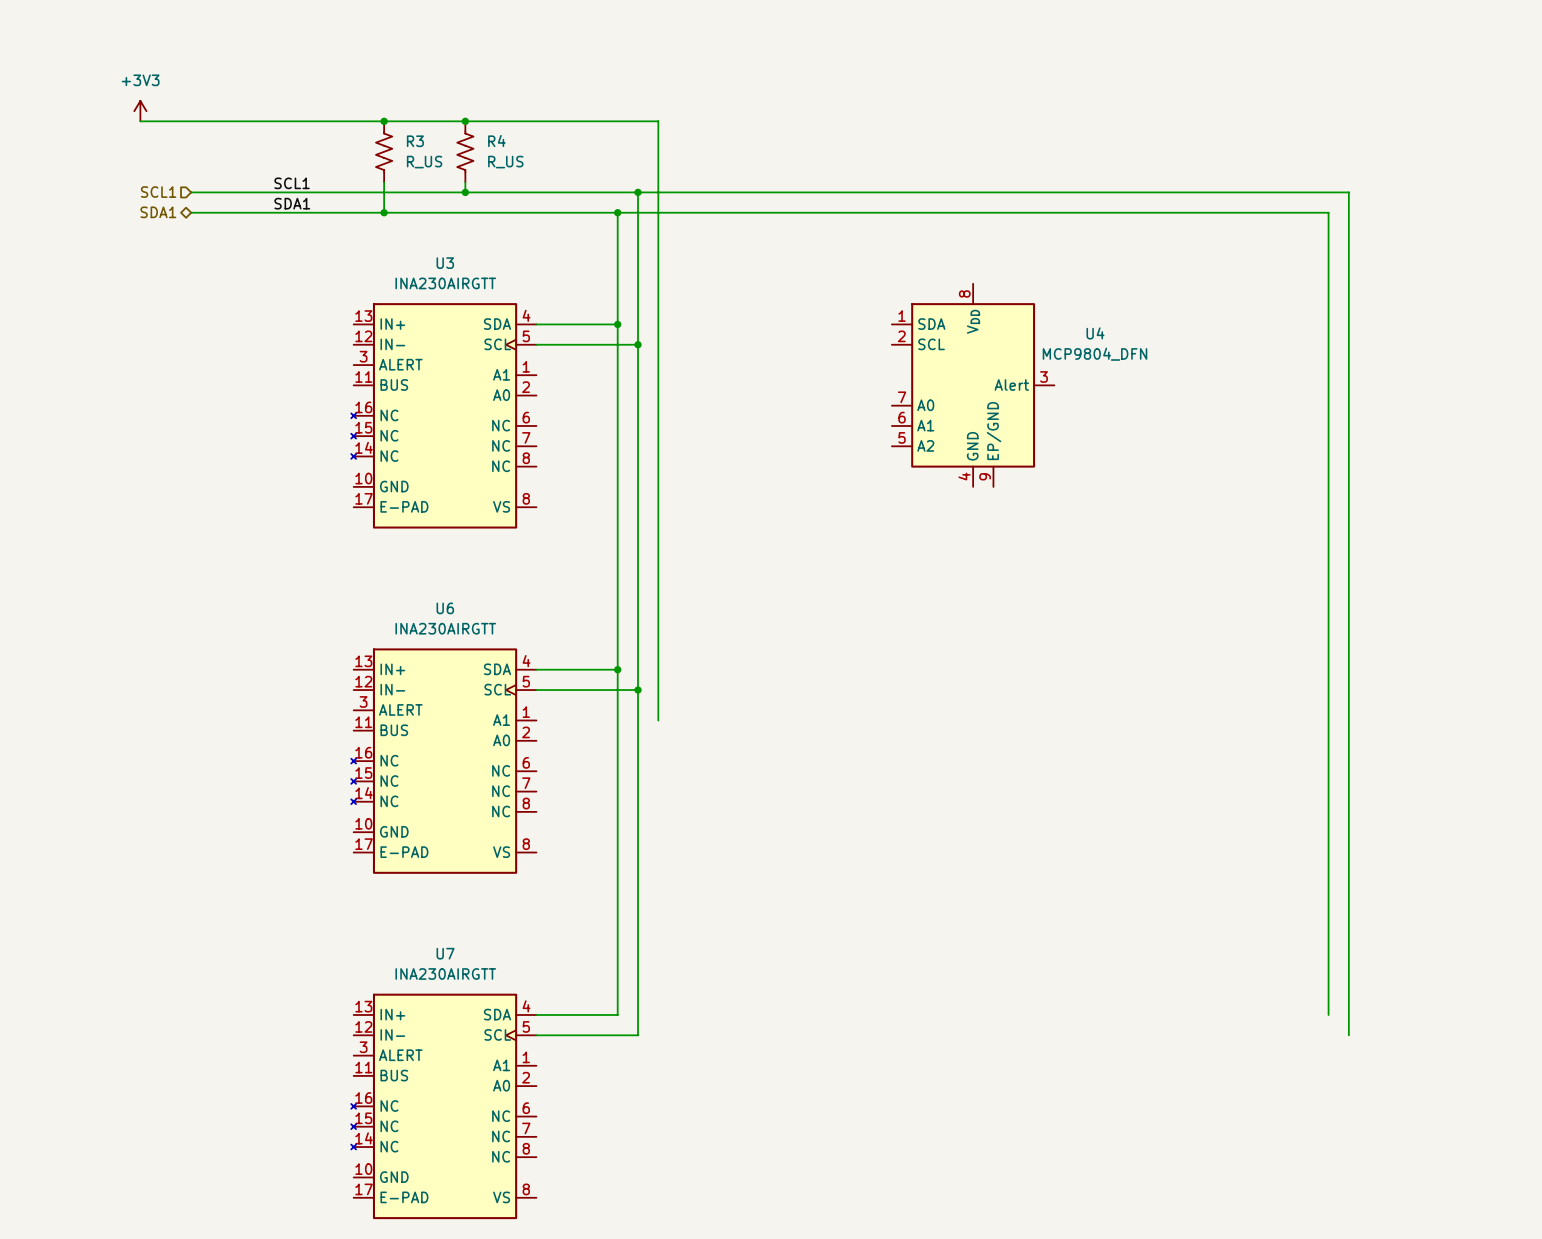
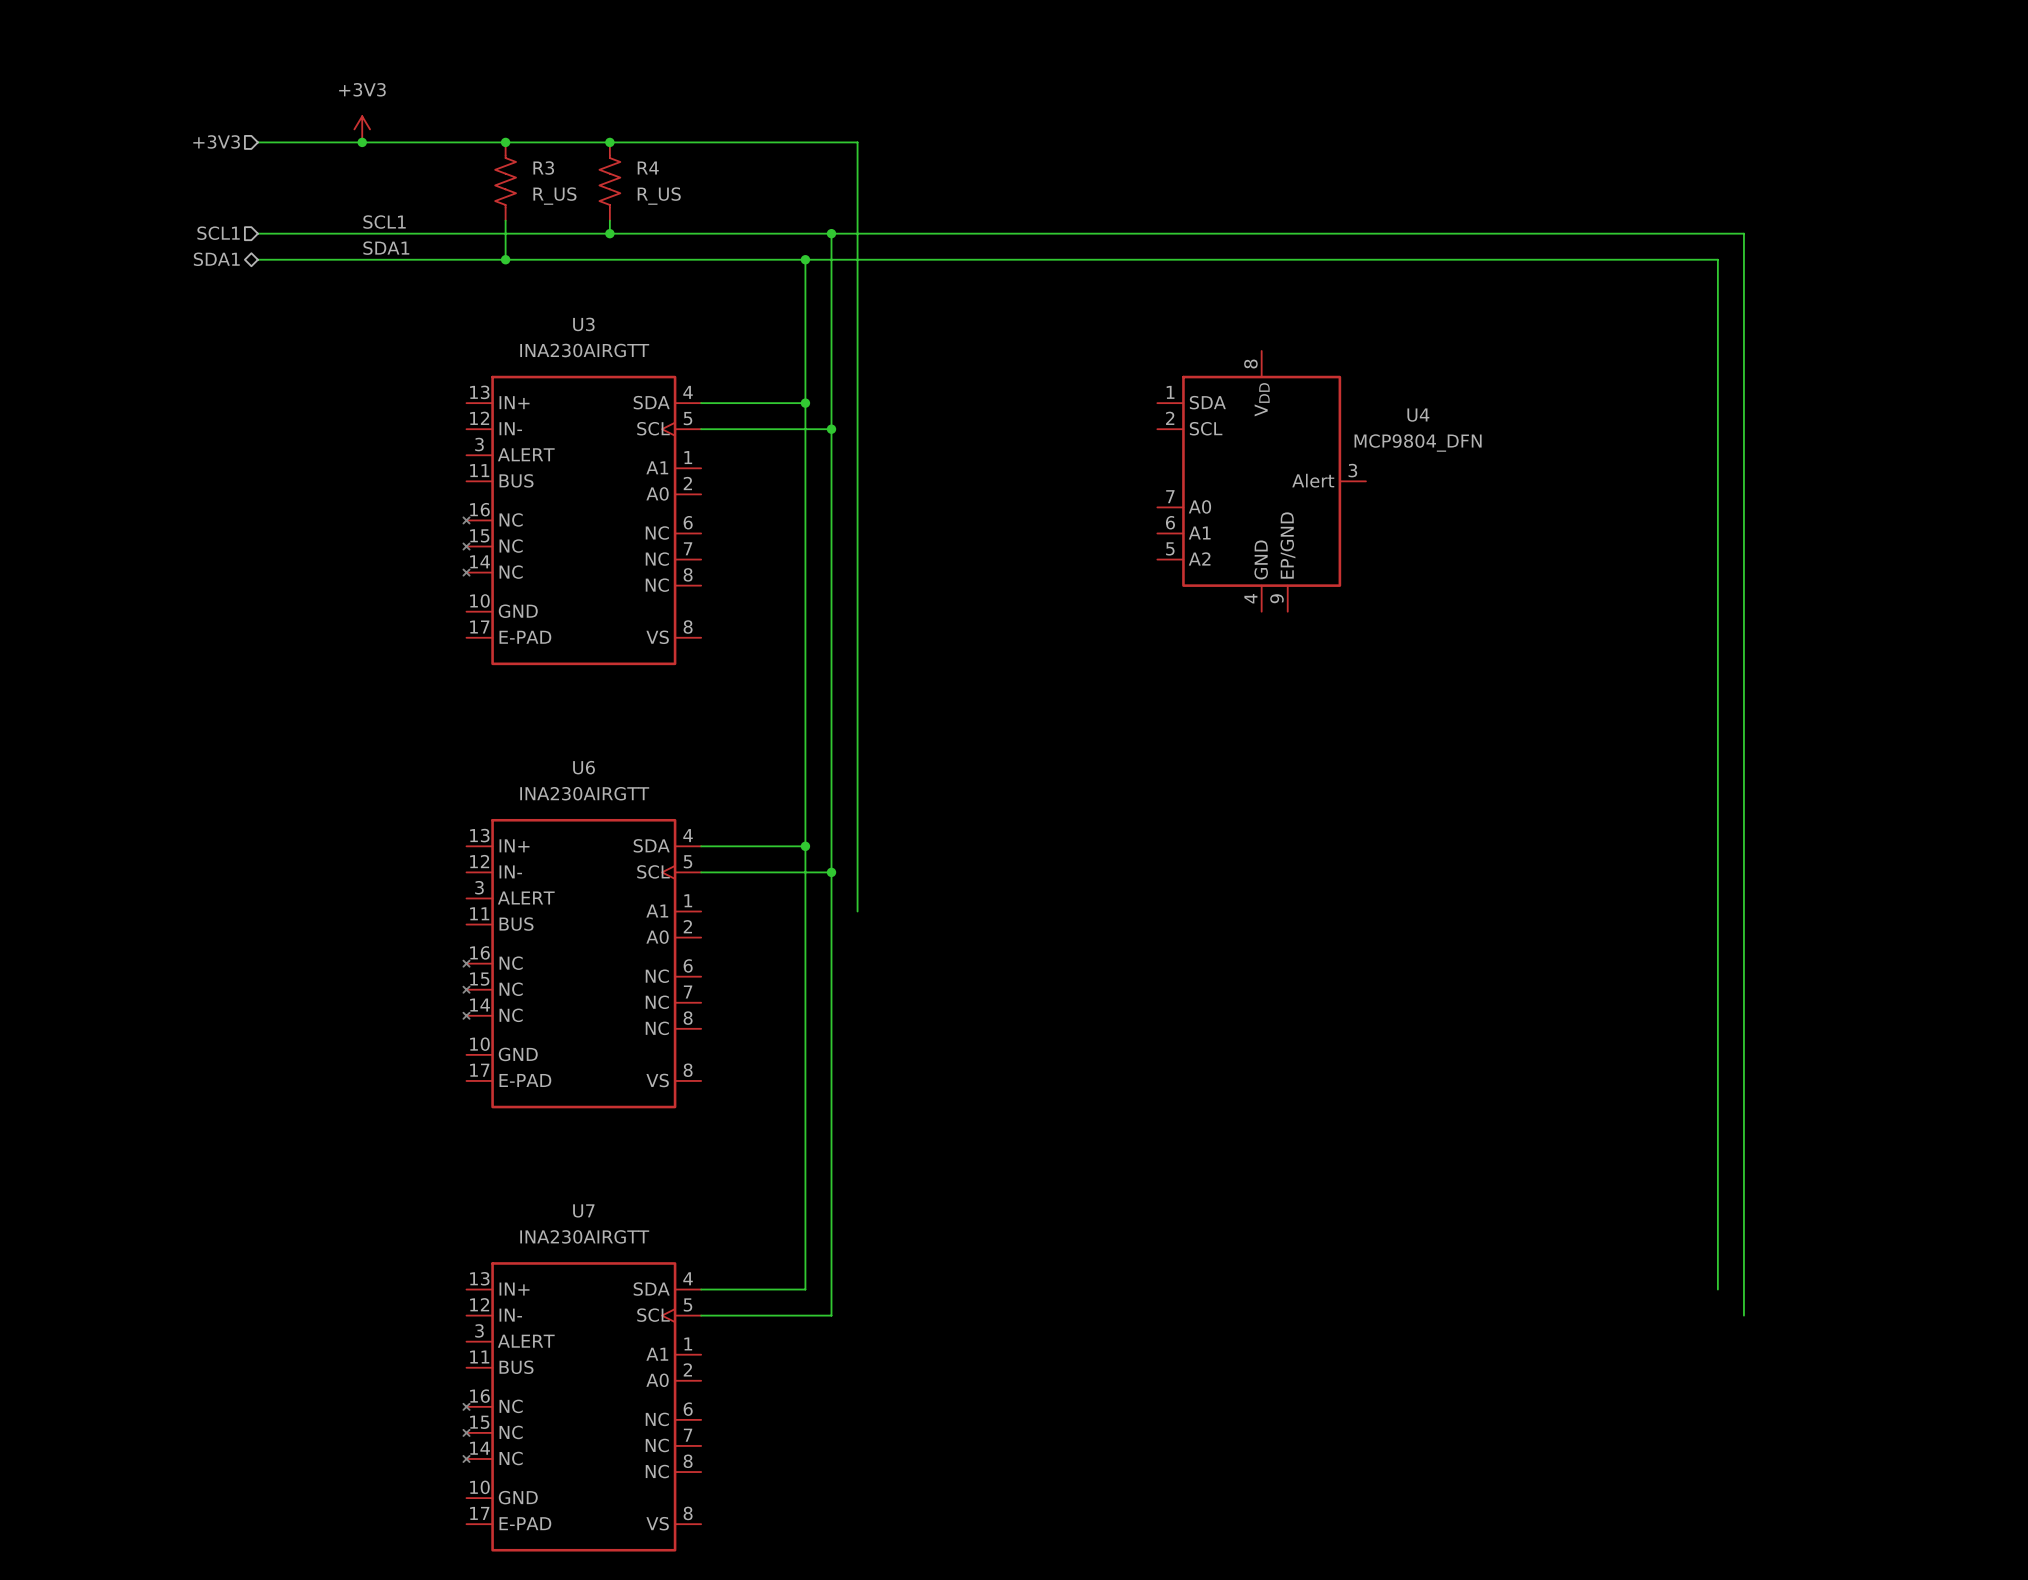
power symbol position: +3V3 (140, 111) -> +3V3 (362, 129)
hierarchical label: none -> +3V3 (216, 141)
wire: (140, 121) (191, 121) -> none
junction: none -> (362, 142)

